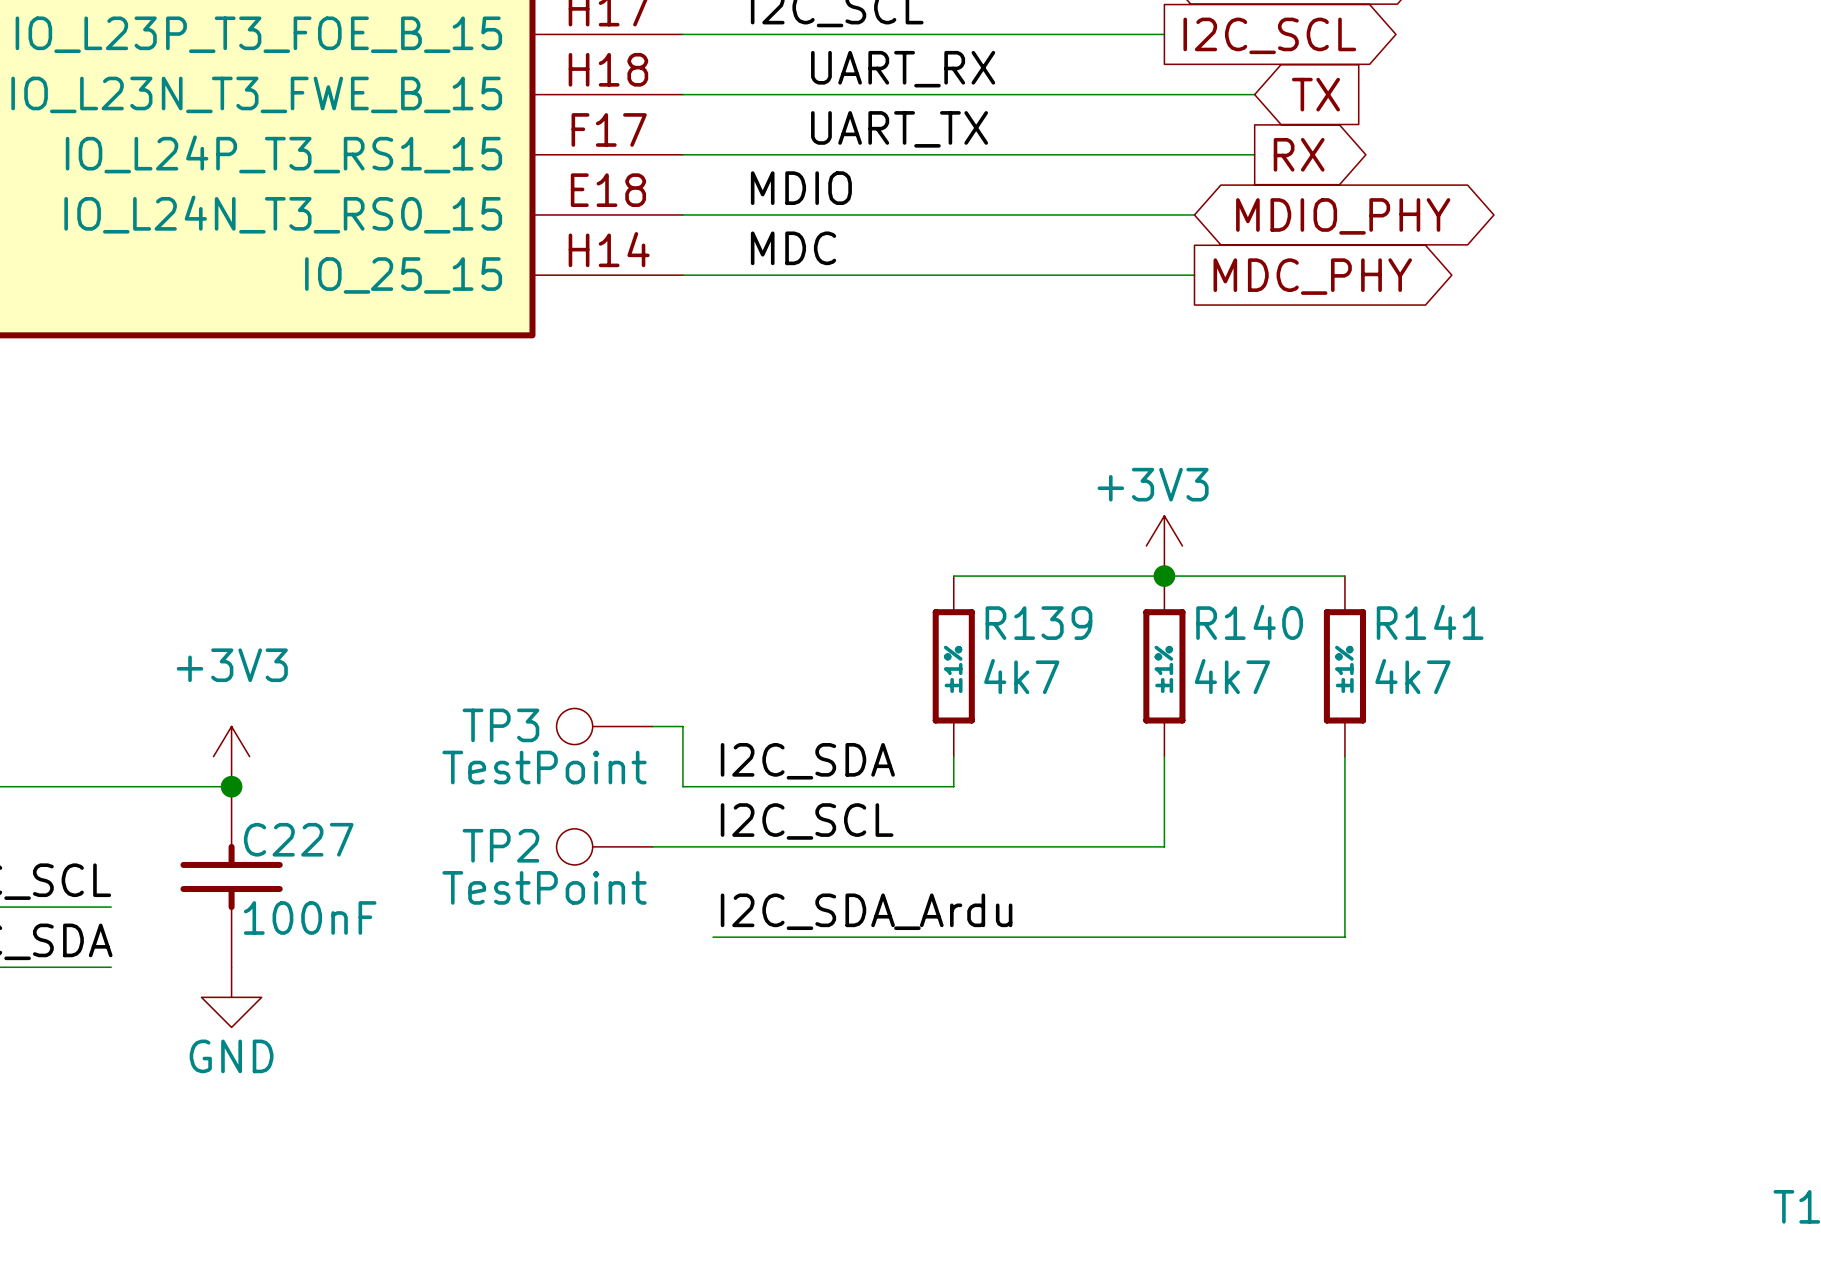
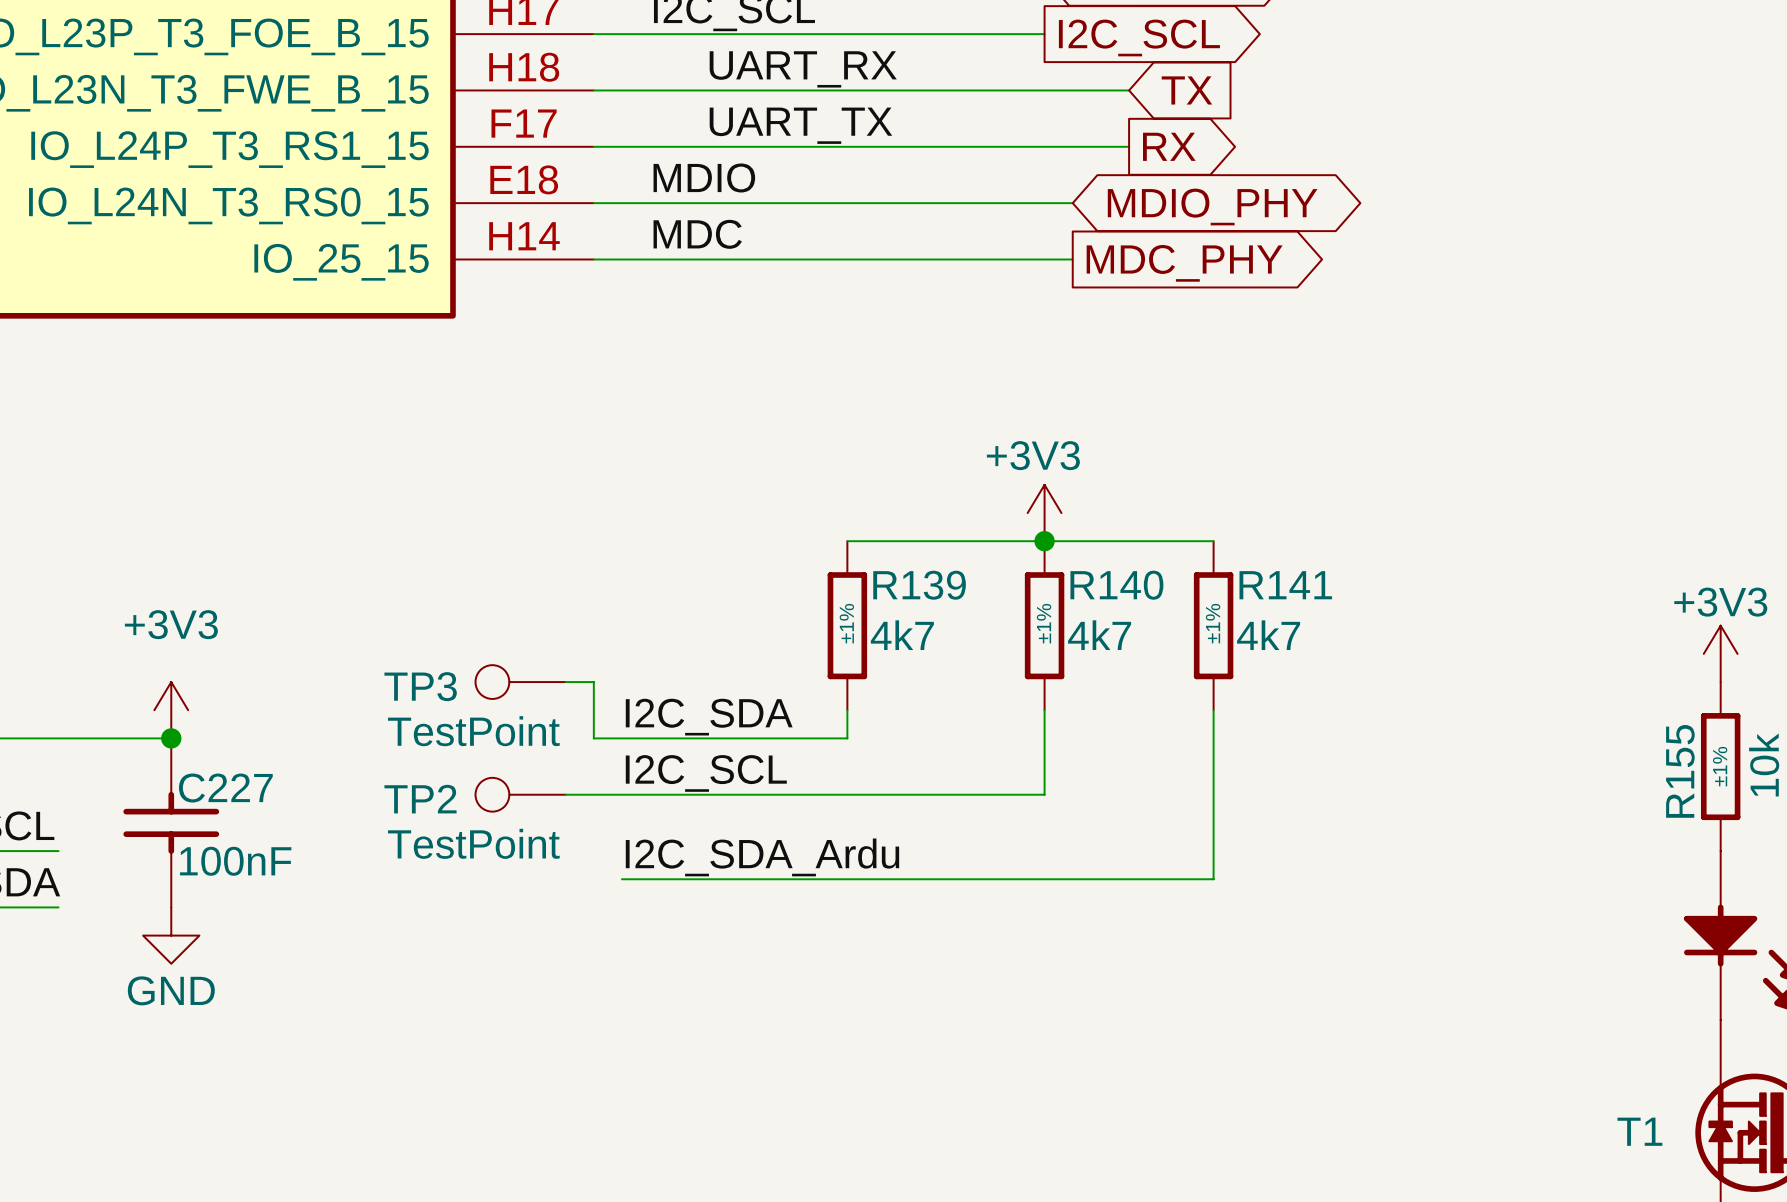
TP3 name position: TP3 (500, 725) -> TP3 (420, 686)
TP3 value position: TestPoint (544, 767) -> TestPoint (473, 731)
TP2 name position: TP2 (500, 845) -> TP2 (420, 799)
TP2 value position: TestPoint (544, 887) -> TestPoint (473, 843)

